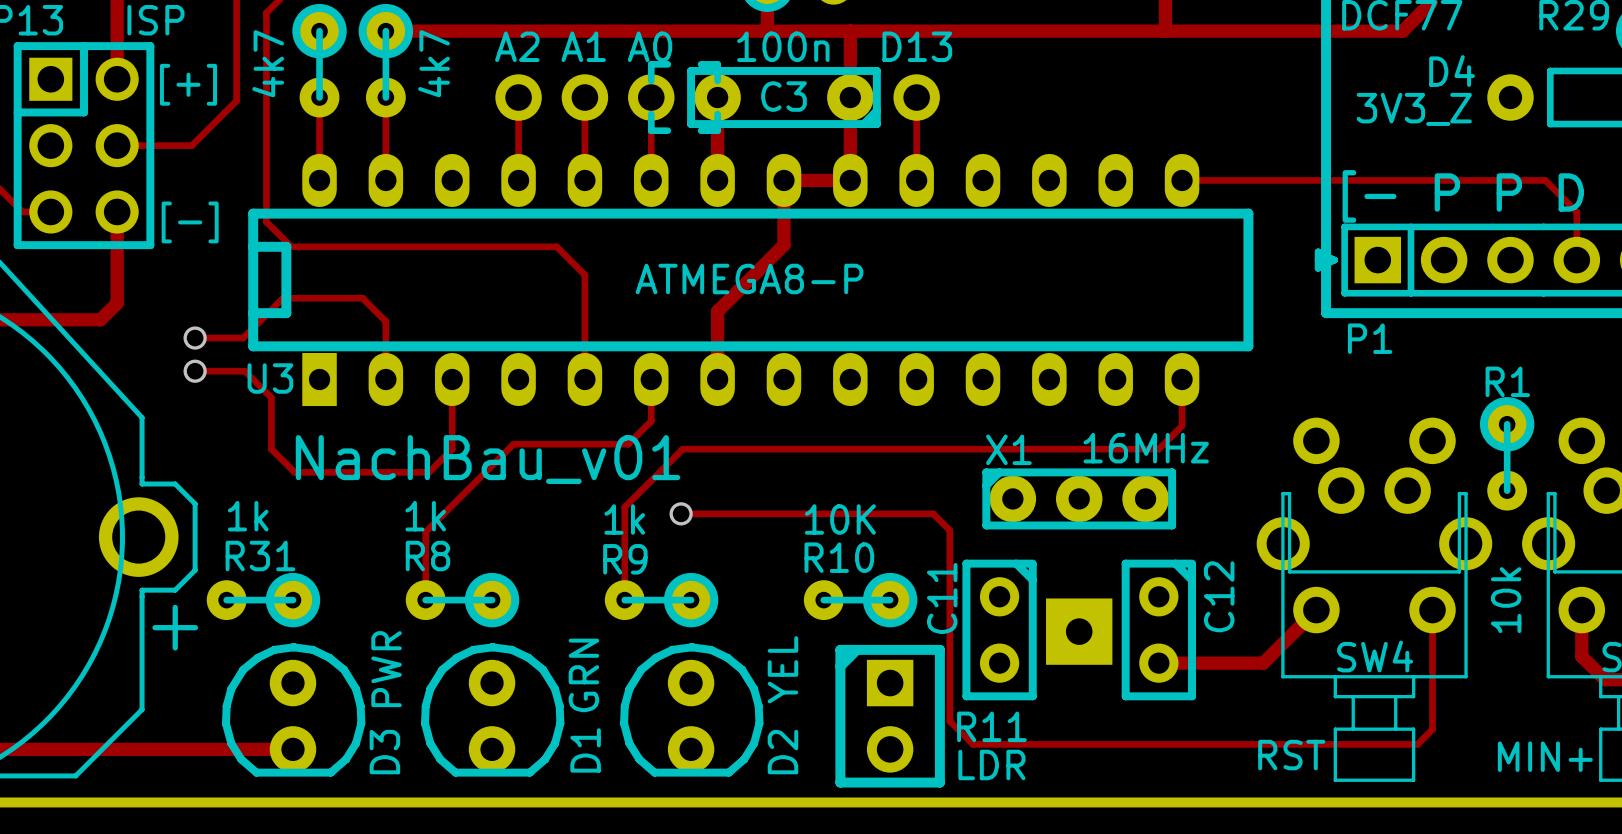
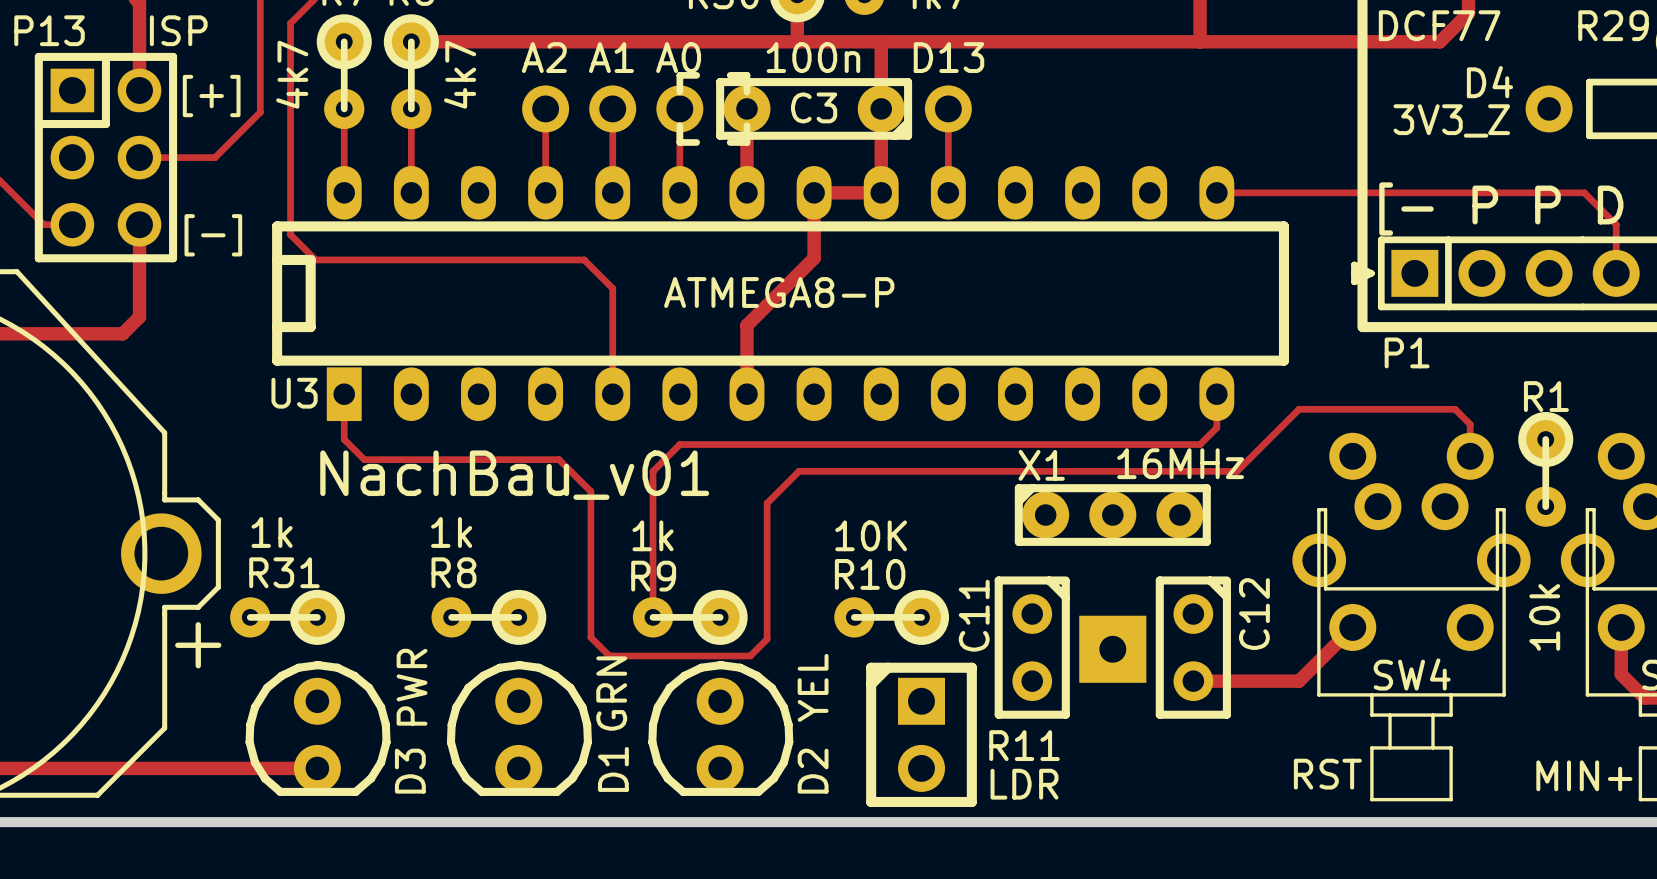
track: (195, 338) (243, 338) (283, 298) (362, 298) (385, 321) (385, 379) -> none
via: (195, 338) -> none
track: (195, 371) (244, 371) (271, 397) (271, 449) (294, 472) (429, 472) (452, 449) (452, 379) -> none
via: (195, 371) -> none
track: (651, 379) (651, 421) (628, 444) (531, 444) -> (1470, 456) (1470, 424) (1455, 409) (1299, 409) (1236, 471) (799, 471) (767, 503) (767, 639) (750, 655) (609, 655) (590, 637) (590, 491) (559, 459)
track: (1182, 412) (1182, 425) (1158, 449) (682, 449) (624, 507) -> (1216, 427) (1200, 444) (679, 444) (653, 471) (653, 523)
track: (513, 444) (425, 532) (425, 600) -> (540, 459) (364, 459) (344, 439) (344, 394)
track: (681, 513) (933, 513) (949, 530) (949, 721) (973, 744) (1417, 744) (1432, 729) (1432, 610) -> none
via: (681, 513) -> none

